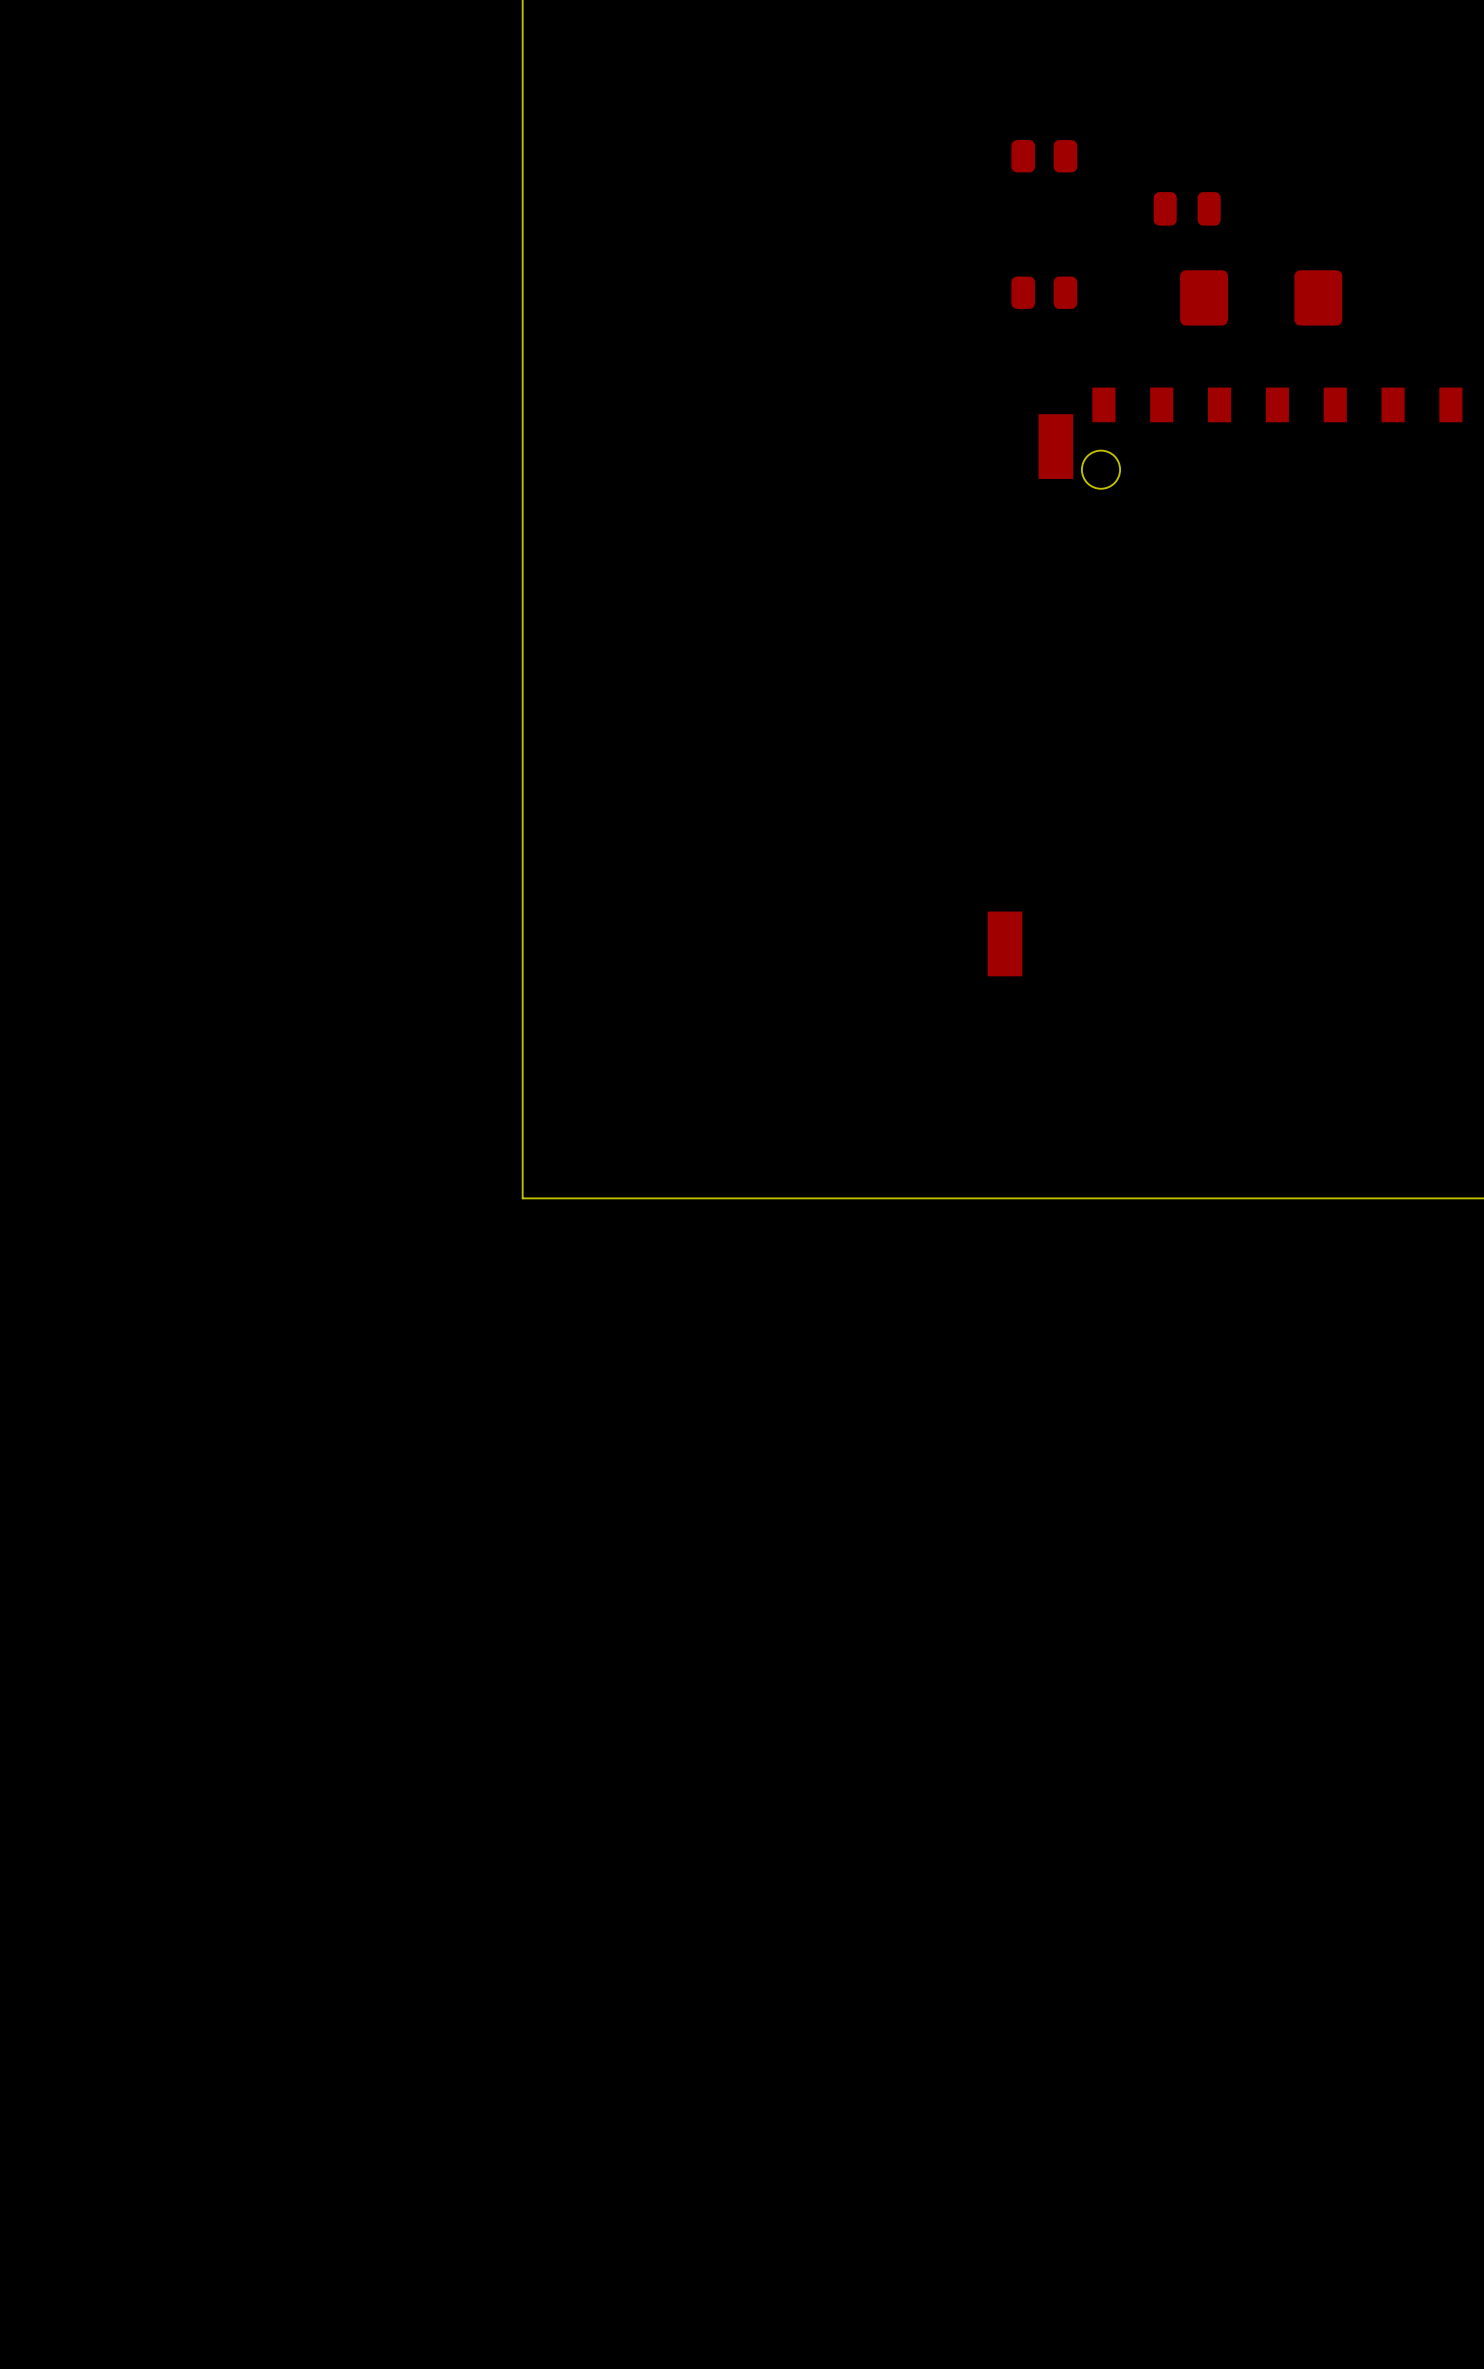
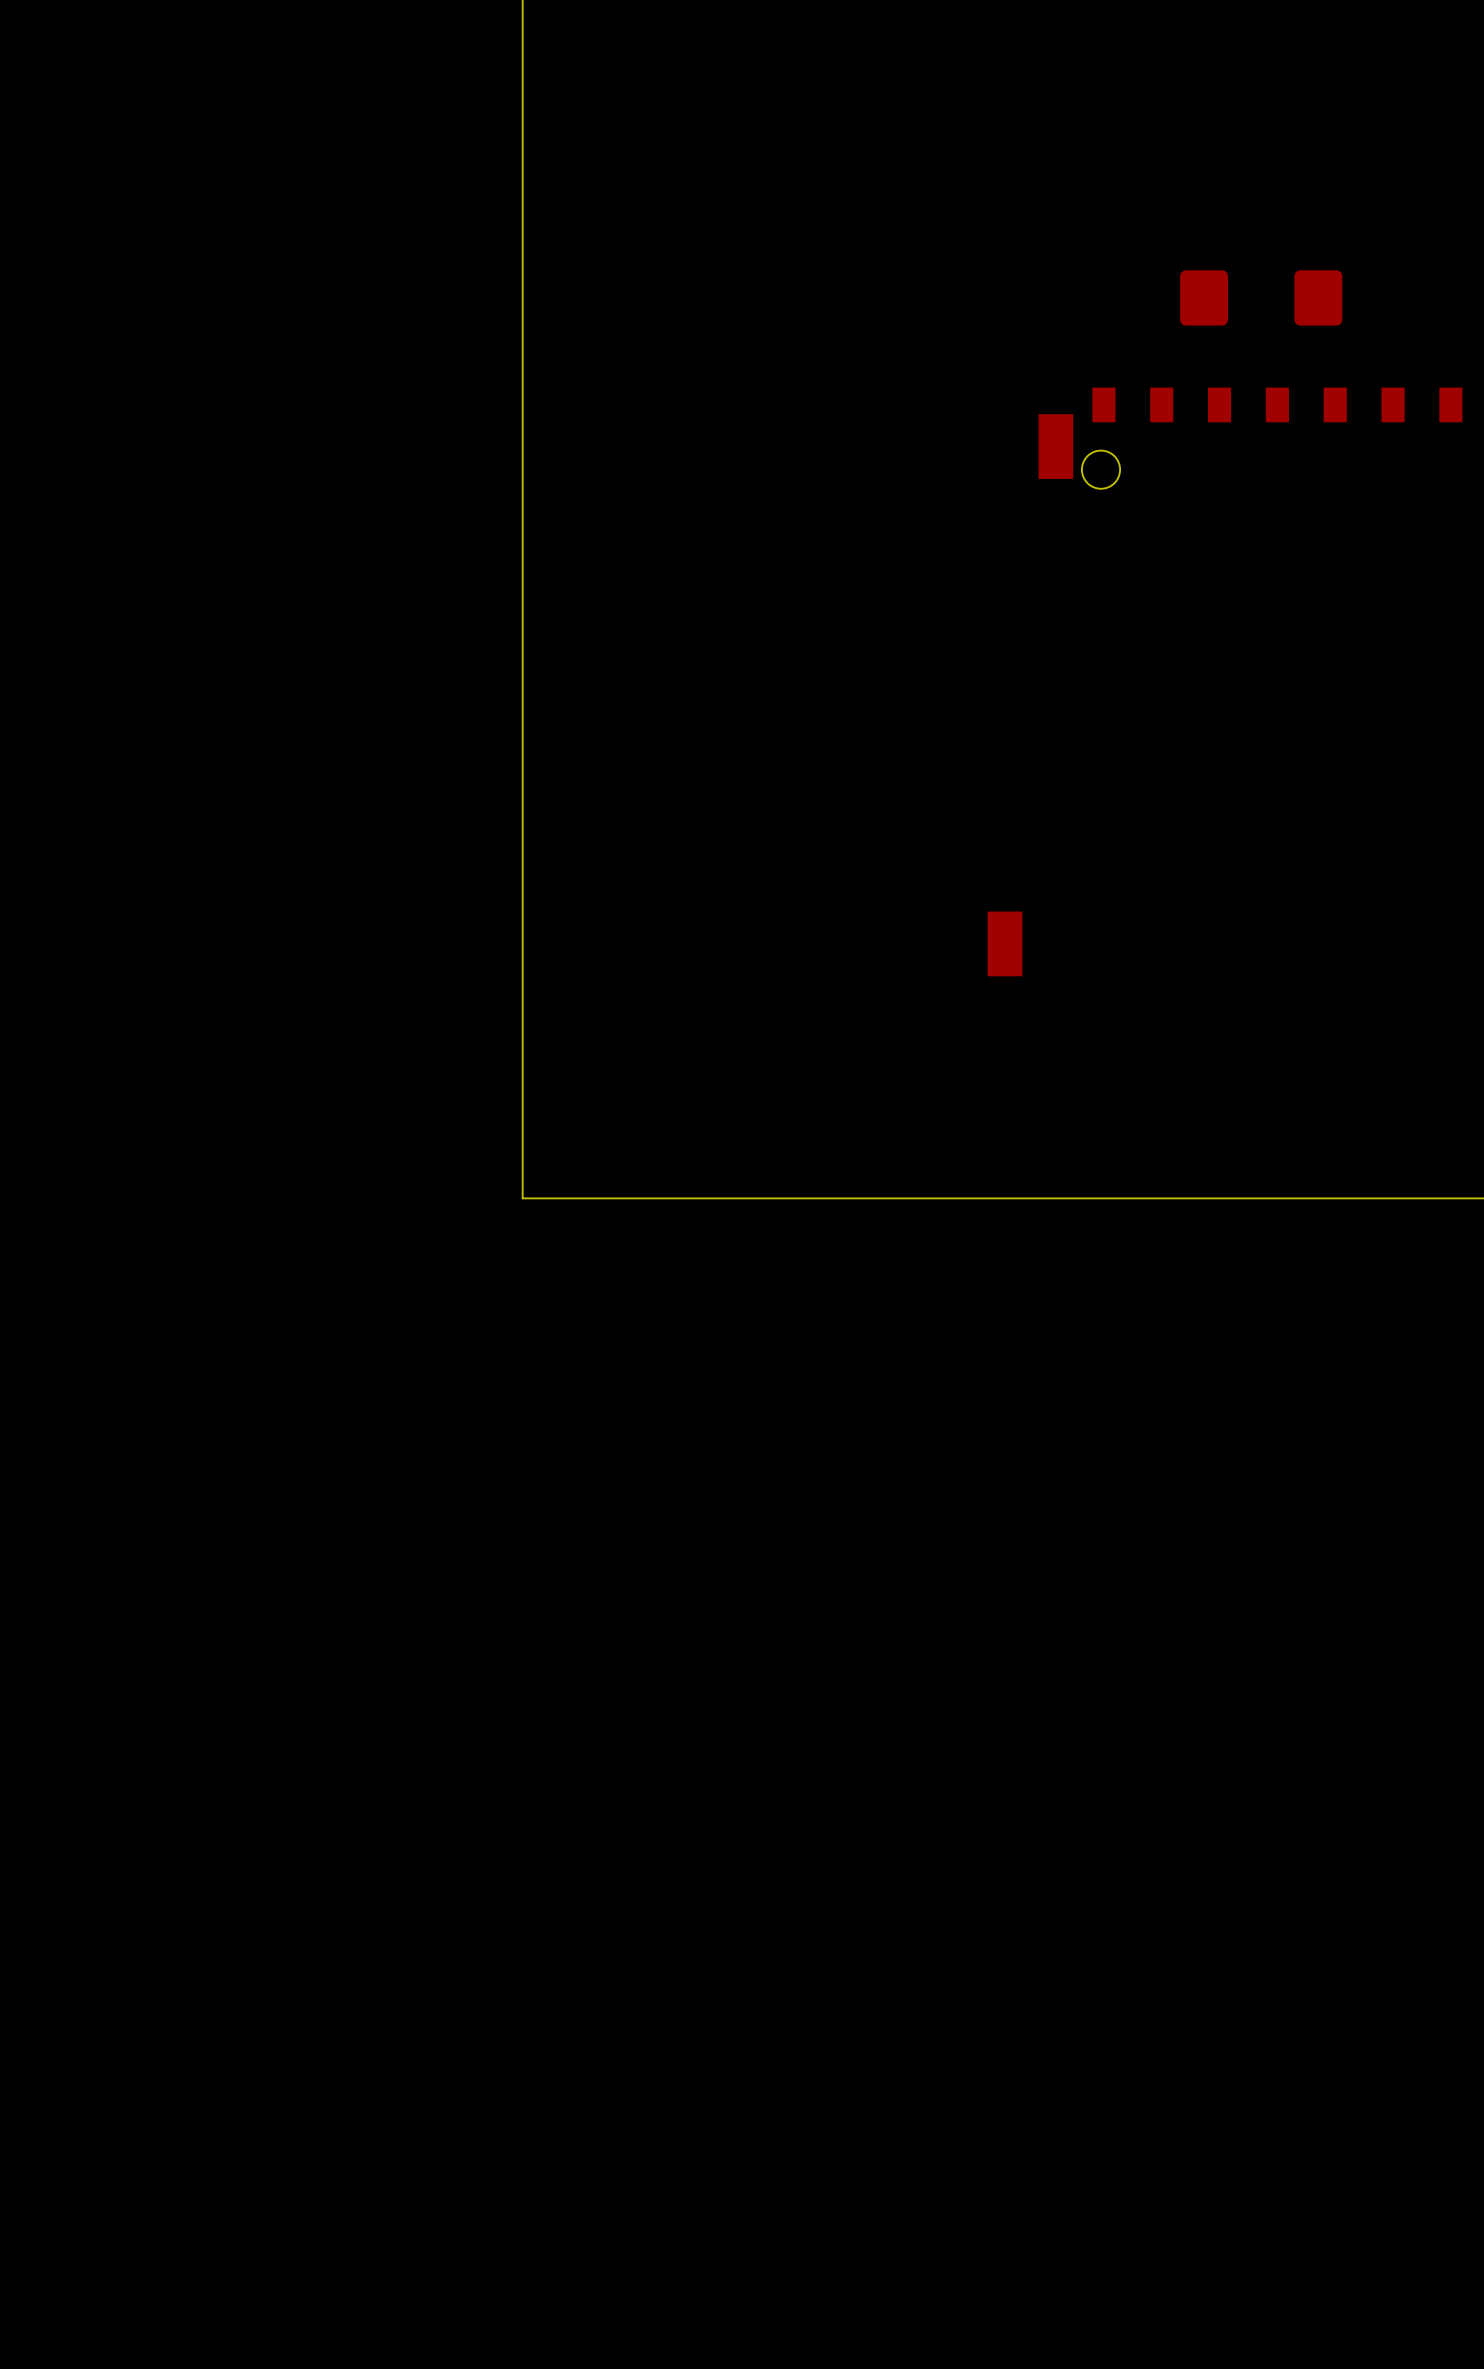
part: (1044, 156) -> none
part: (1187, 208) -> none
part: (1044, 292) -> none

